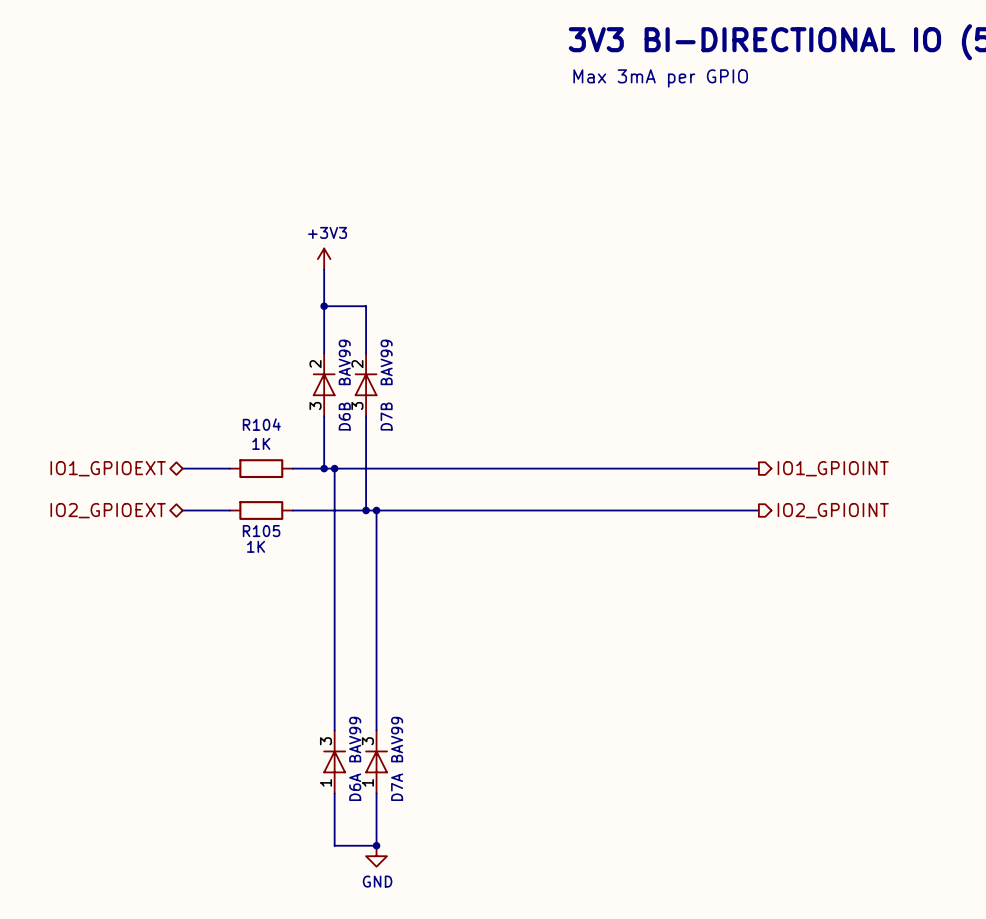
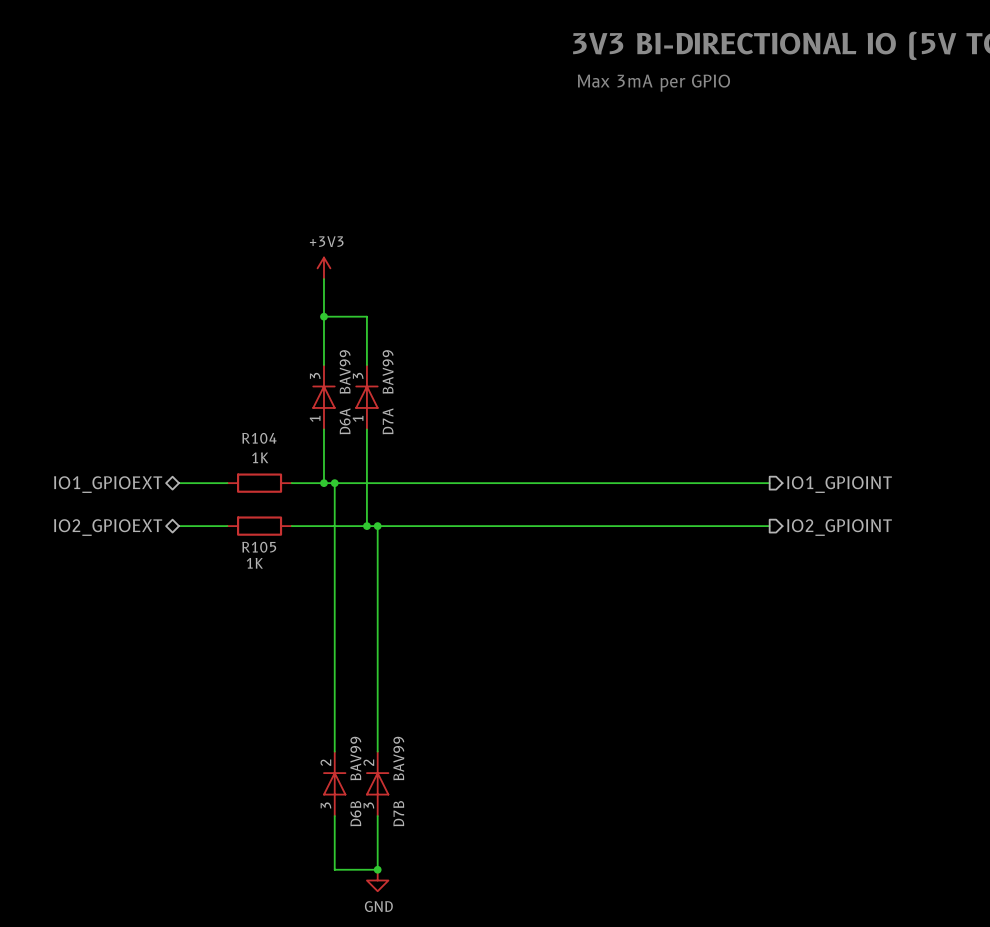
D6B position: (324, 384) -> (334, 783)
D7B position: (366, 384) -> (377, 783)
D6A position: (334, 761) -> (323, 397)
D7A position: (376, 761) -> (366, 397)

